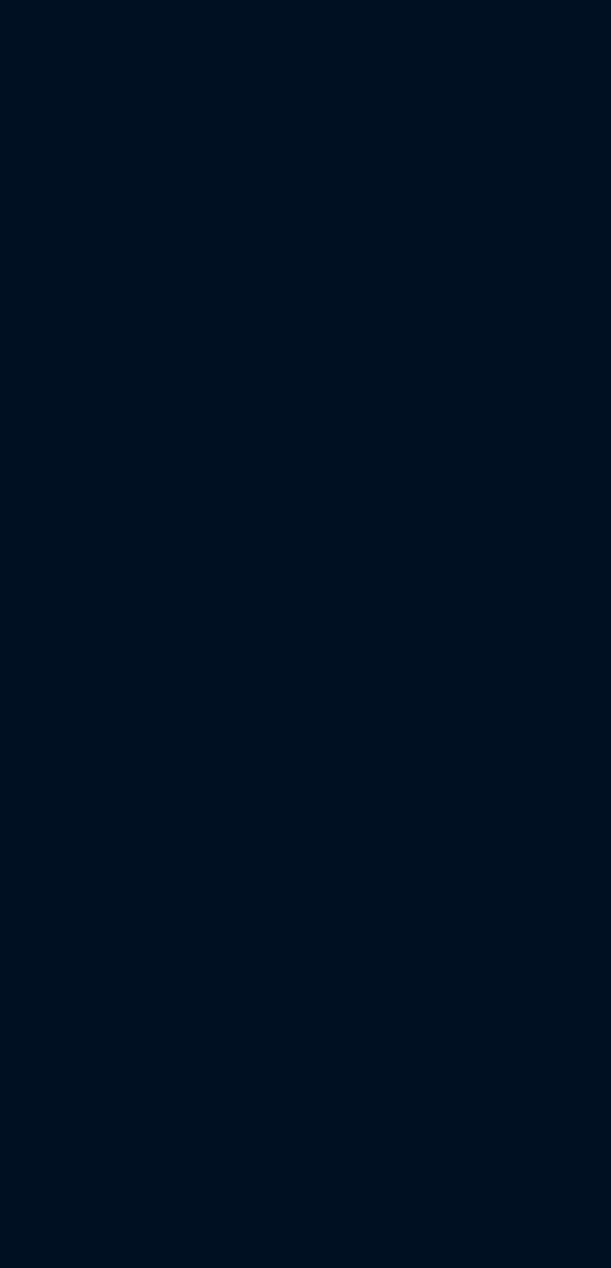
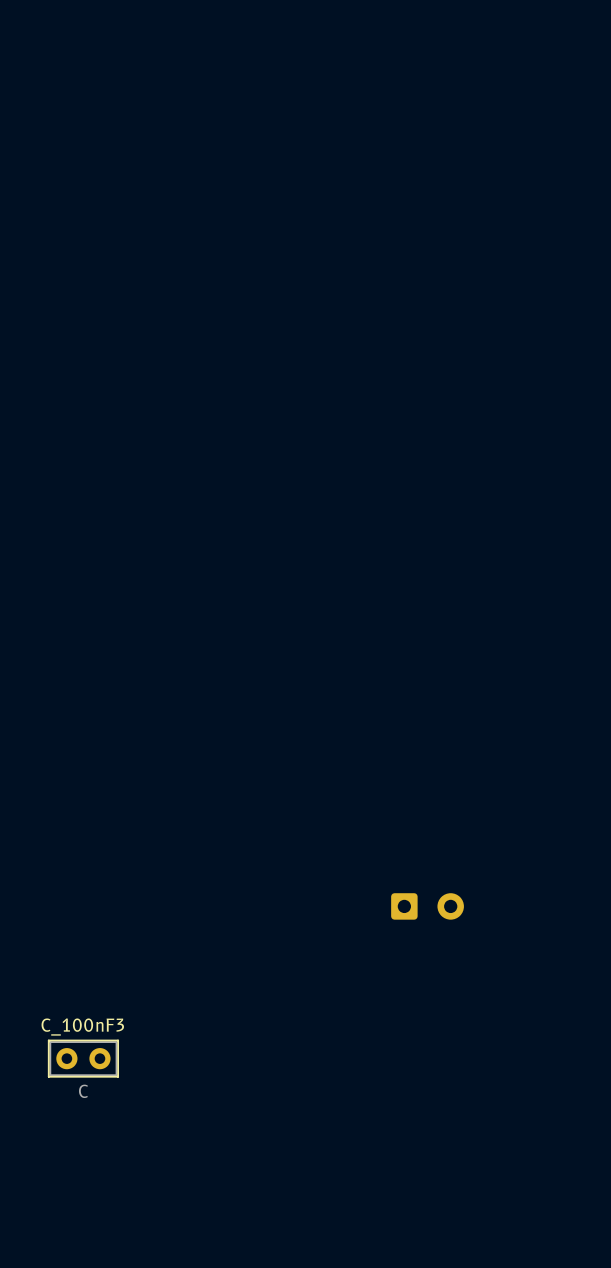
part: none -> (427, 906)
C_100nF3: none -> C (83, 1058)

